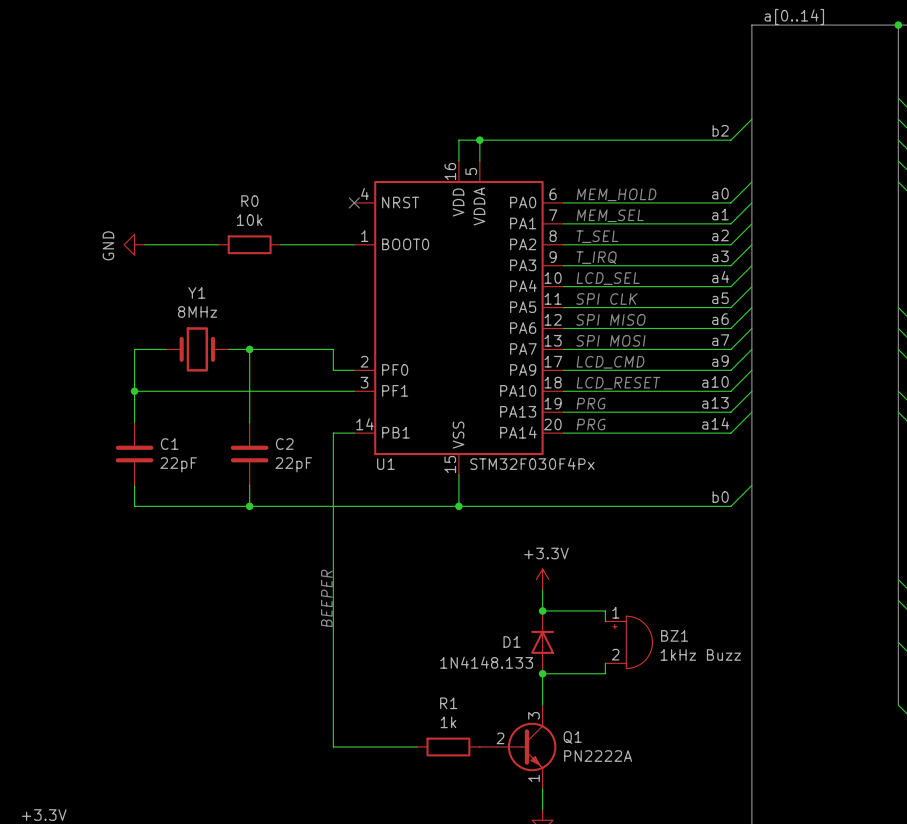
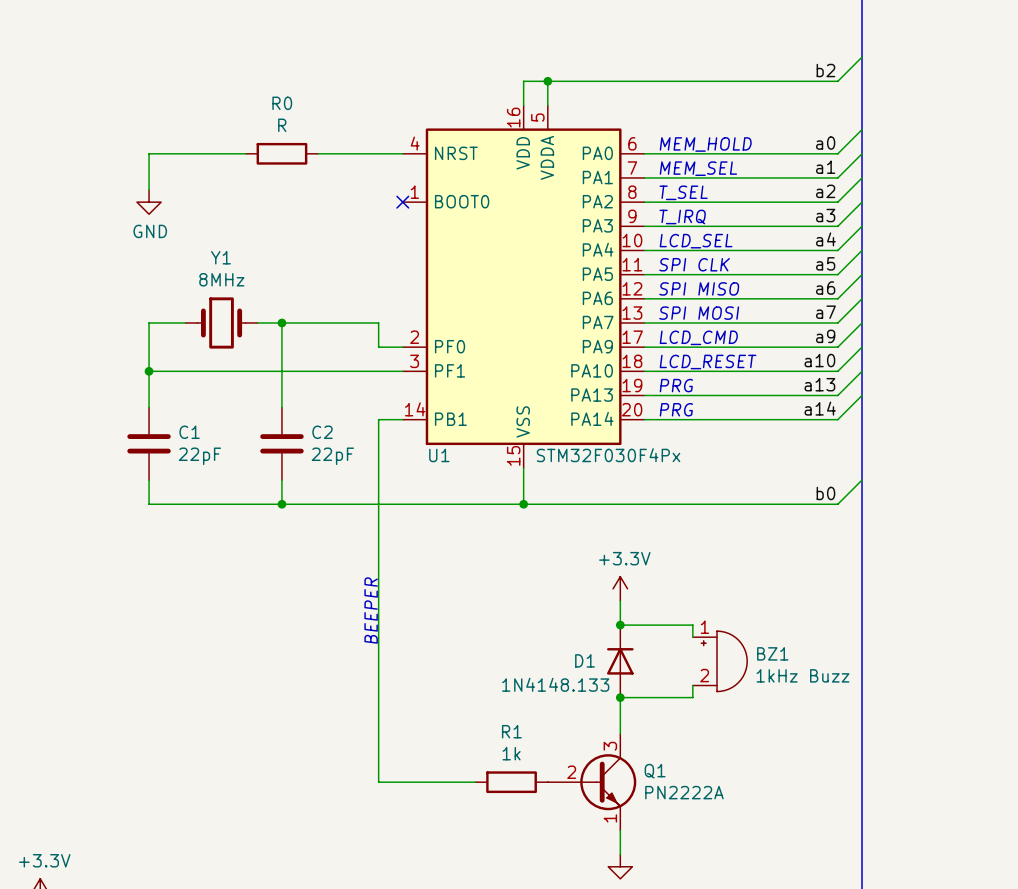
wire: none -> (245, 153) (149, 153) (149, 190)
no-connect mark position: (354, 202) -> (402, 202)
R0 value: 10k (249, 220) -> R (282, 125)
power symbol rotation: 0° (134, 244) -> 90° counterclockwise (149, 202)
wire: (145, 244) (218, 244) -> none
R0 position: (249, 244) -> (281, 153)
wire: (281, 244) (354, 244) -> (318, 153) (402, 153)

